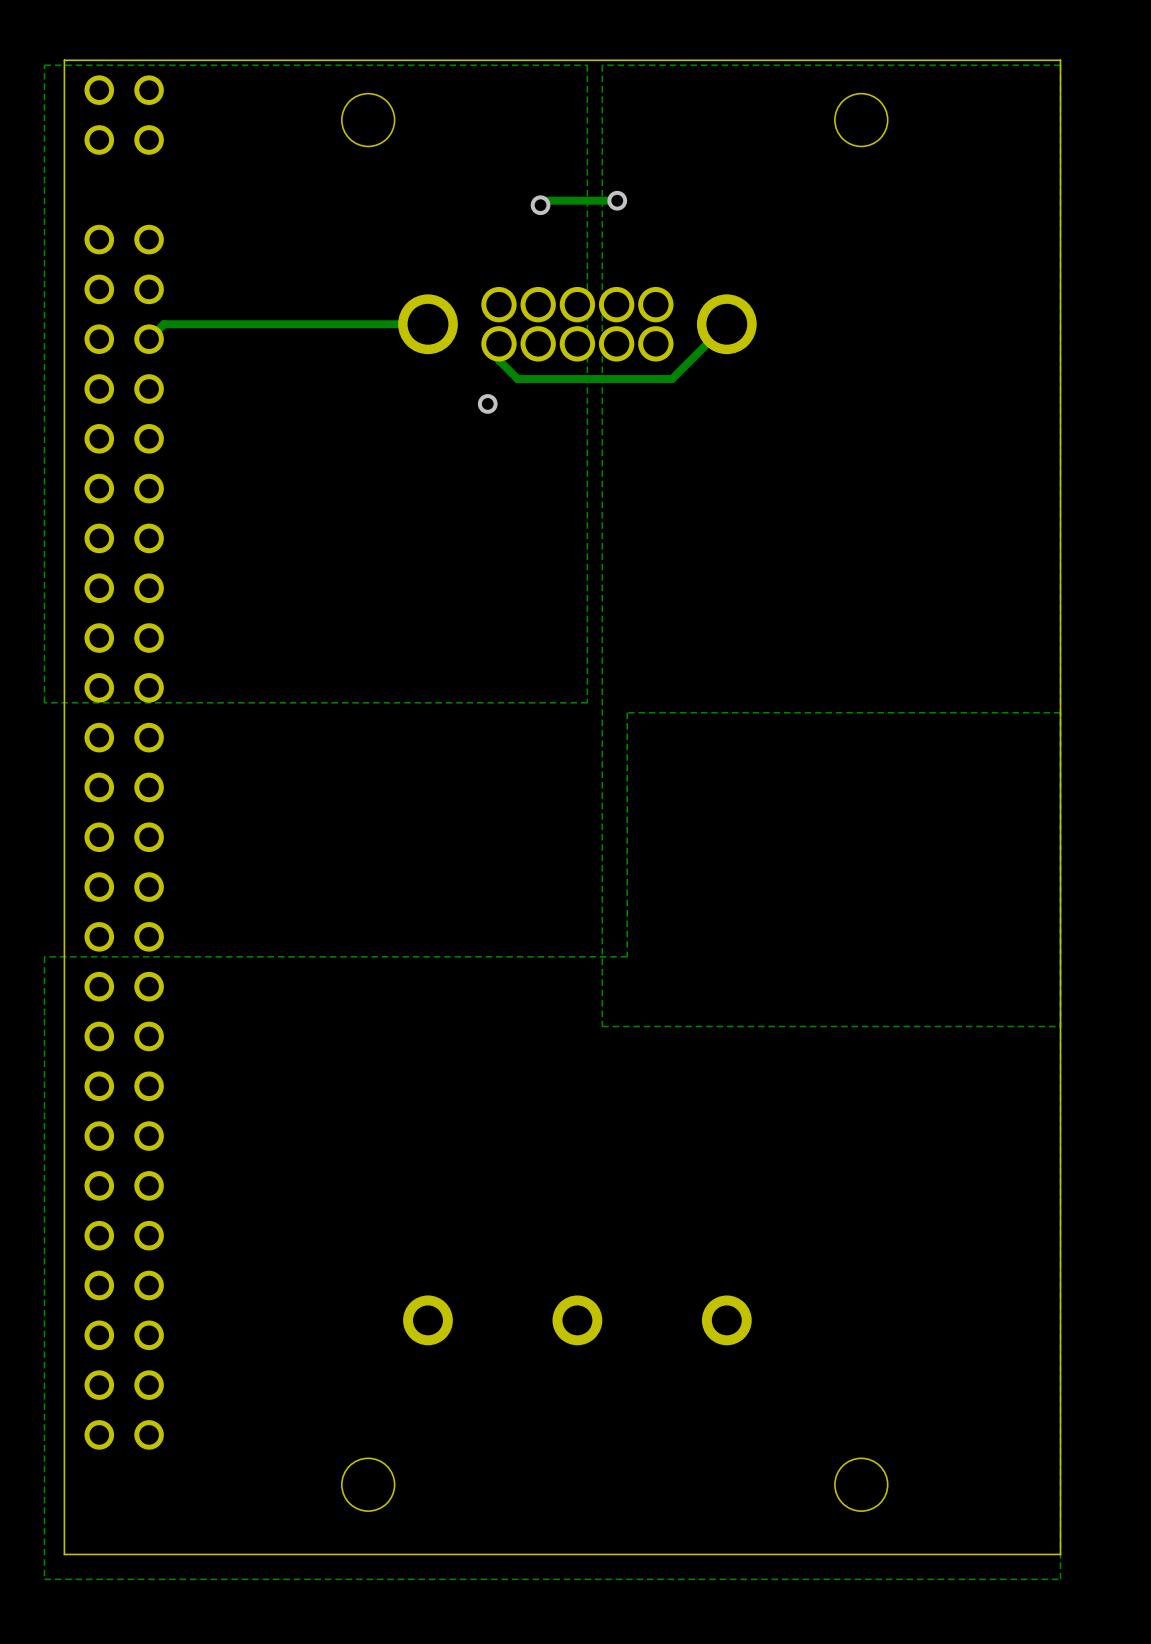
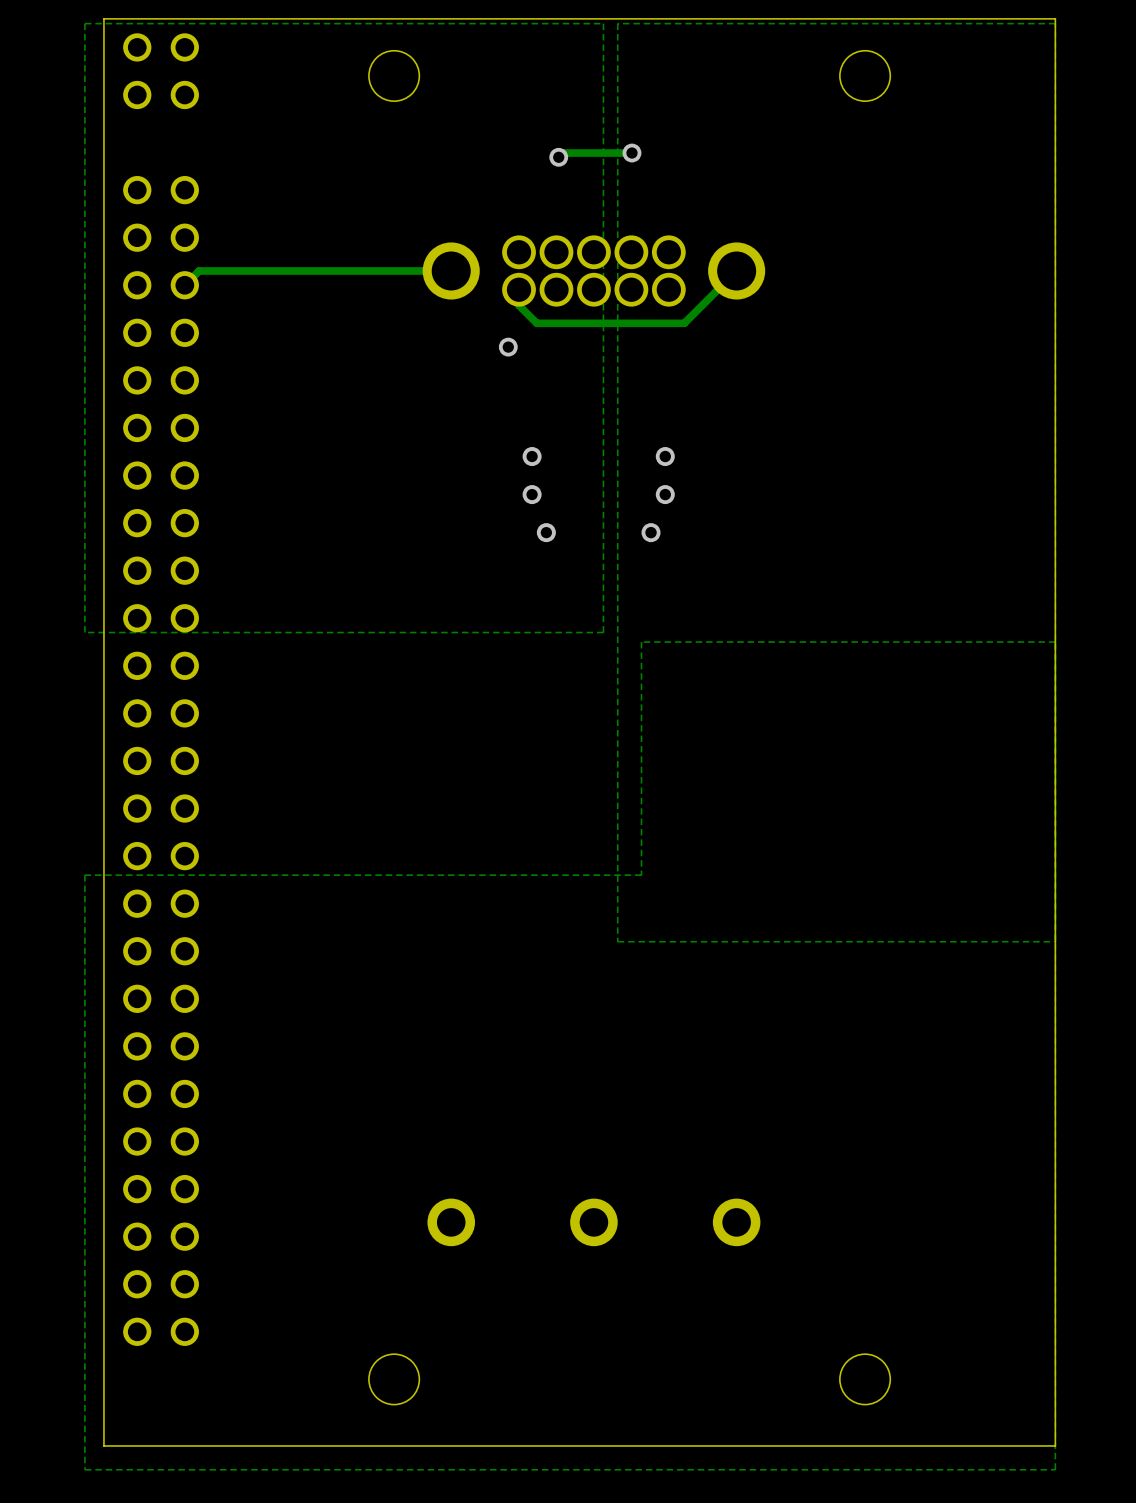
via: none -> (532, 456)
via: none -> (665, 456)
via: none -> (532, 494)
via: none -> (665, 494)
via: none -> (546, 532)
via: none -> (651, 532)

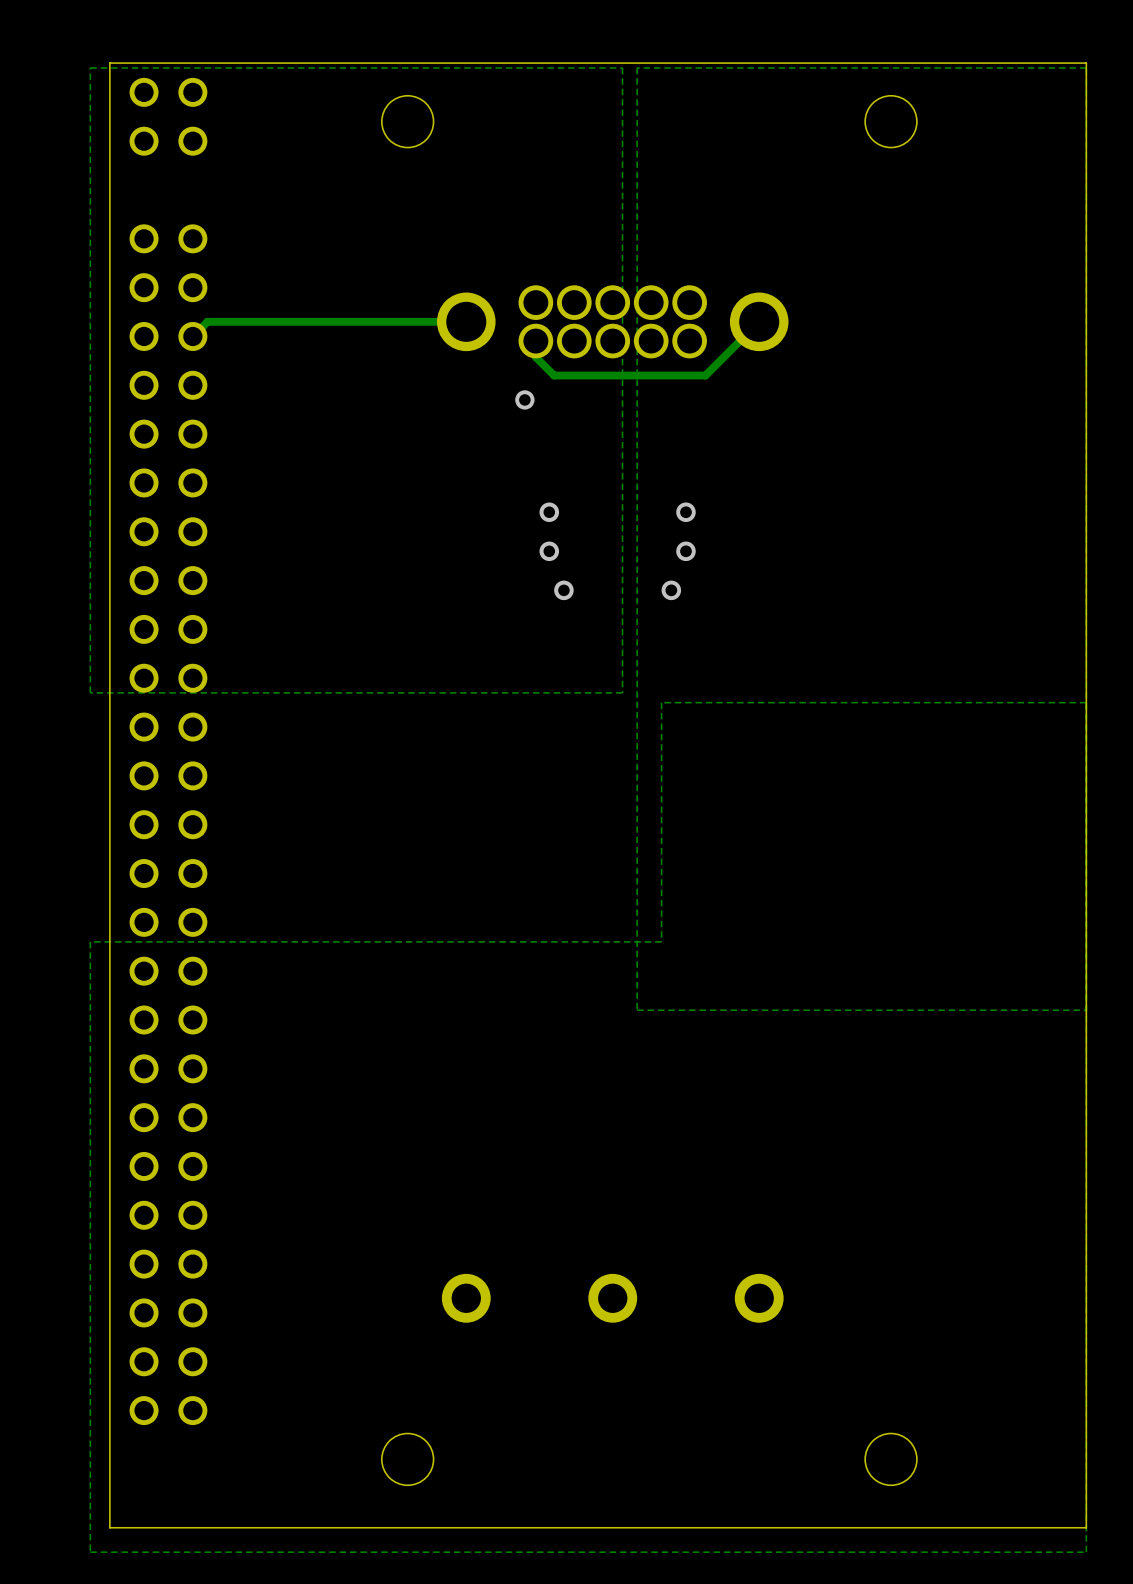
track: (631, 153) (563, 153) (558, 157) -> none
via: (631, 153) -> none
via: (558, 157) -> none

